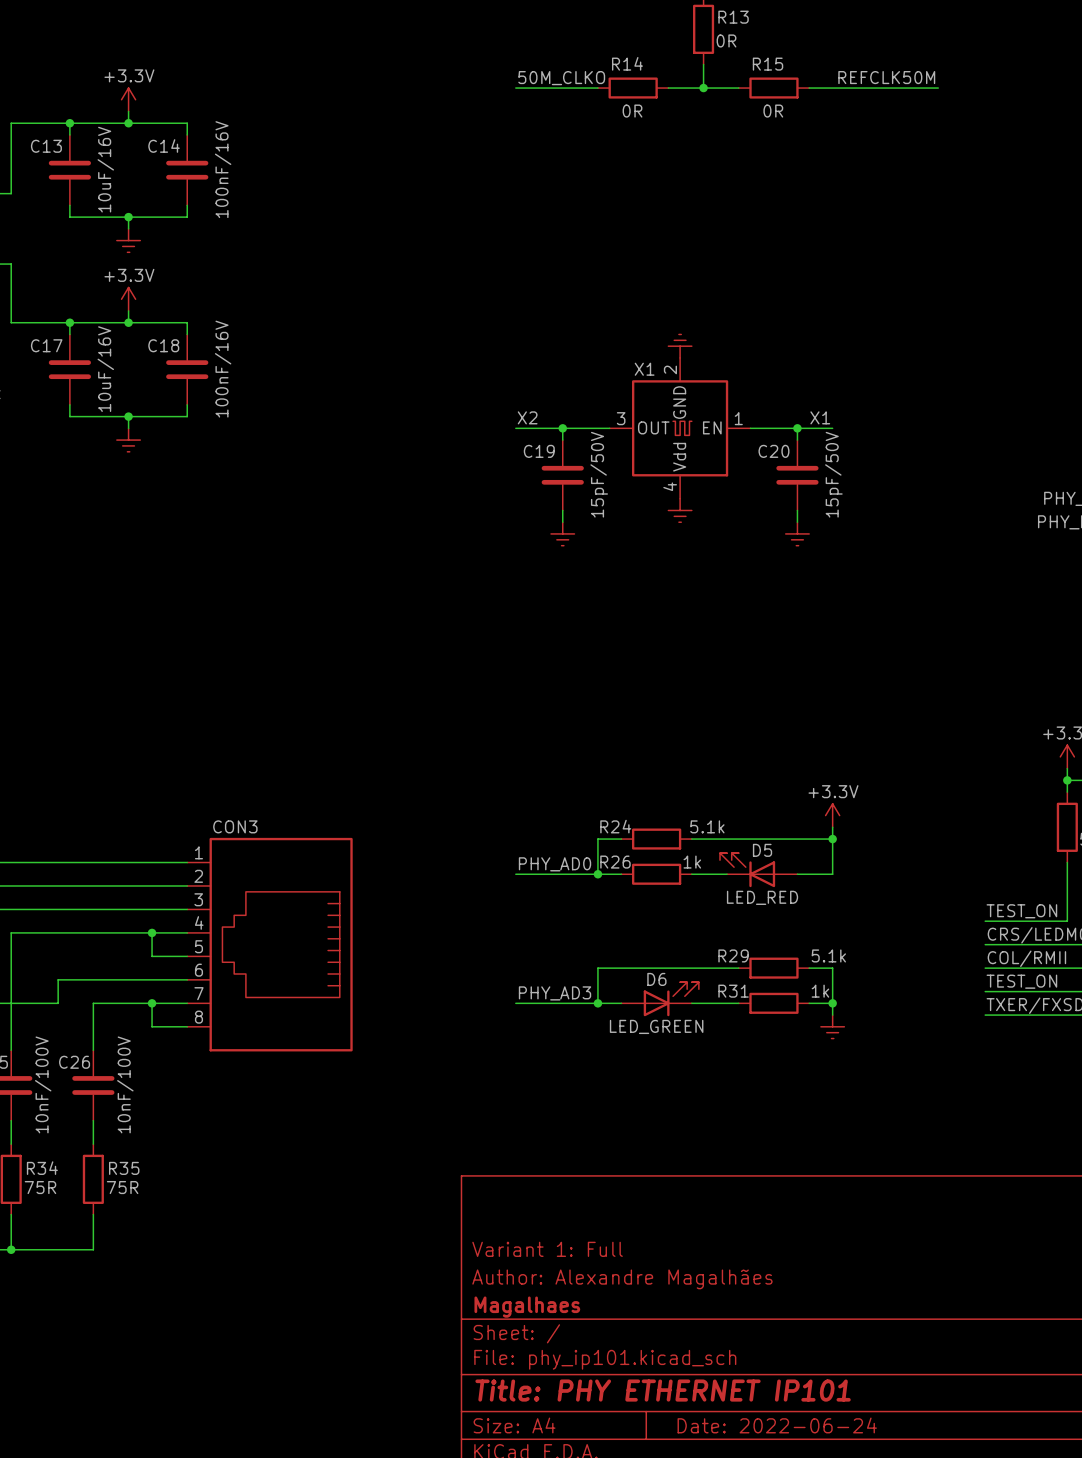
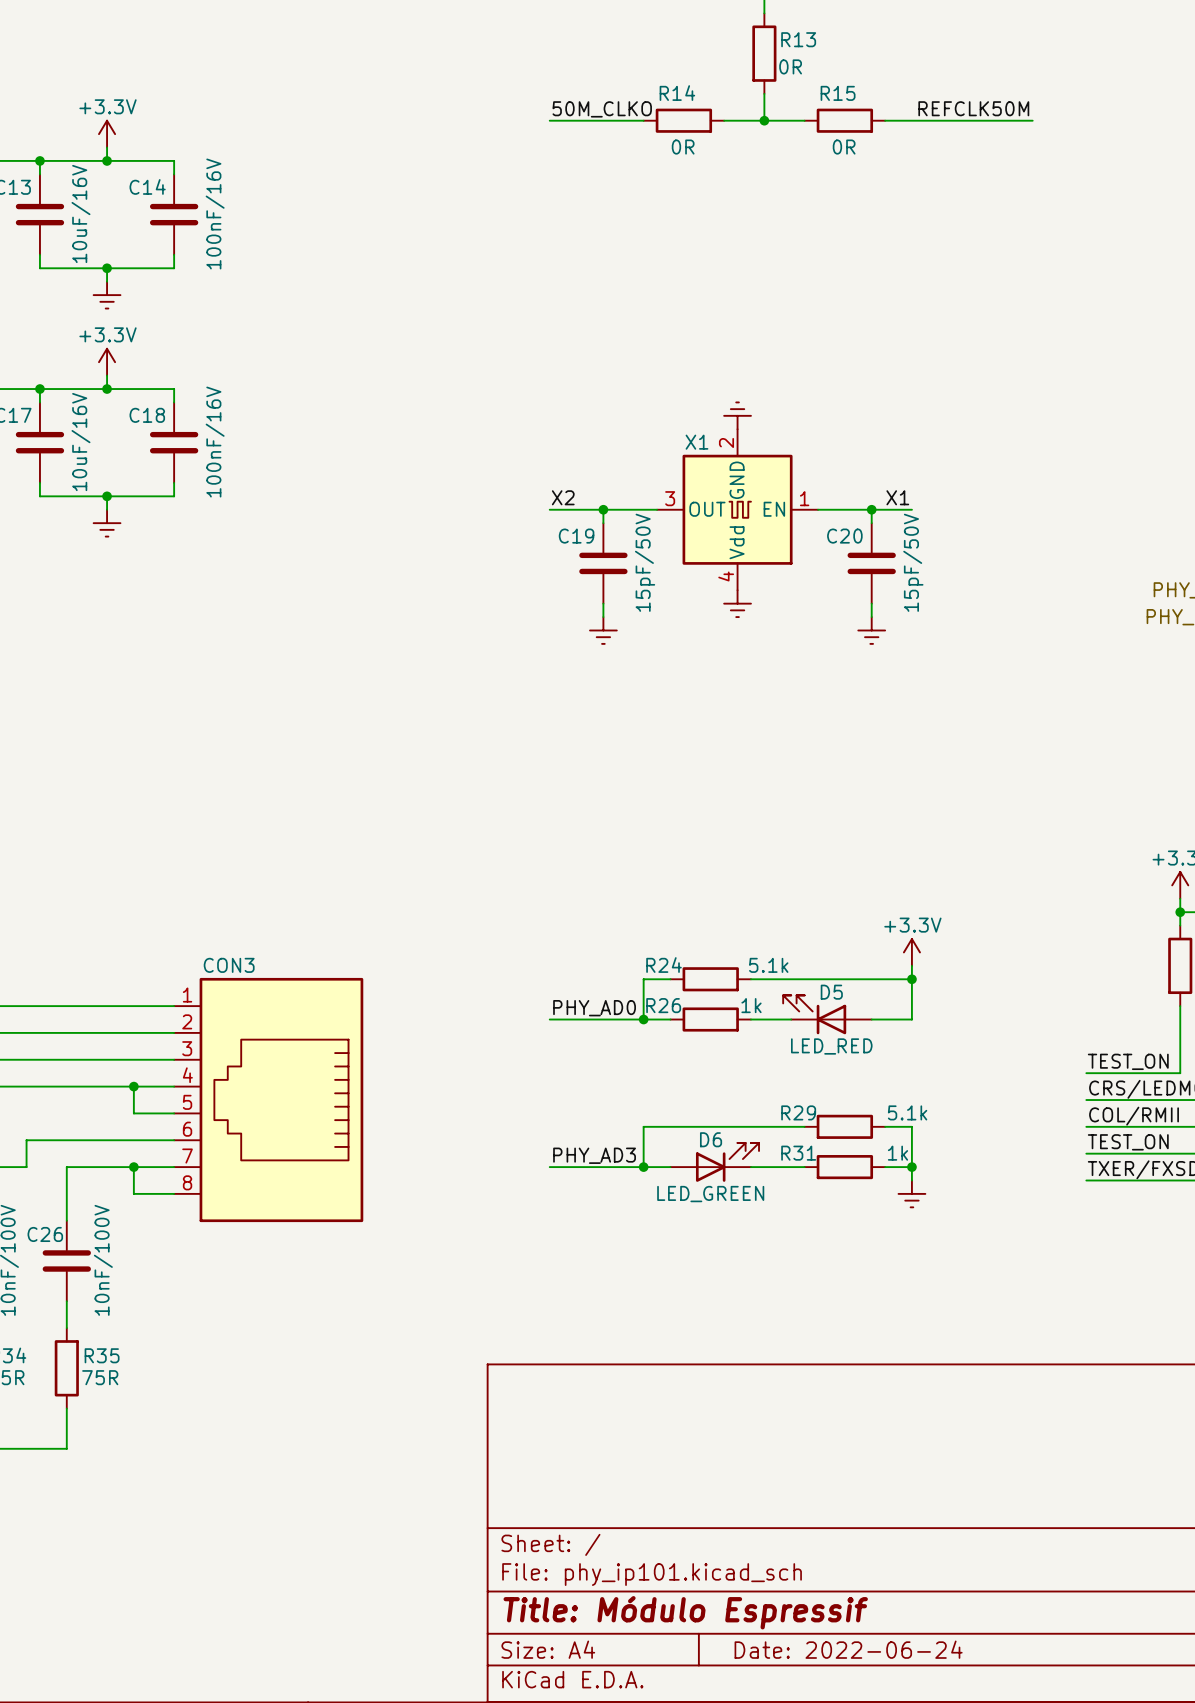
title block: Variant 1: Full (547, 1249) -> none
title block: Author: Alexandre Magalhães (622, 1279) -> none
title block: Magalhaes (527, 1307) -> none
title block: Title: PHY ETHERNET IP101 (663, 1390) -> Title: Módulo Espressif (685, 1612)

